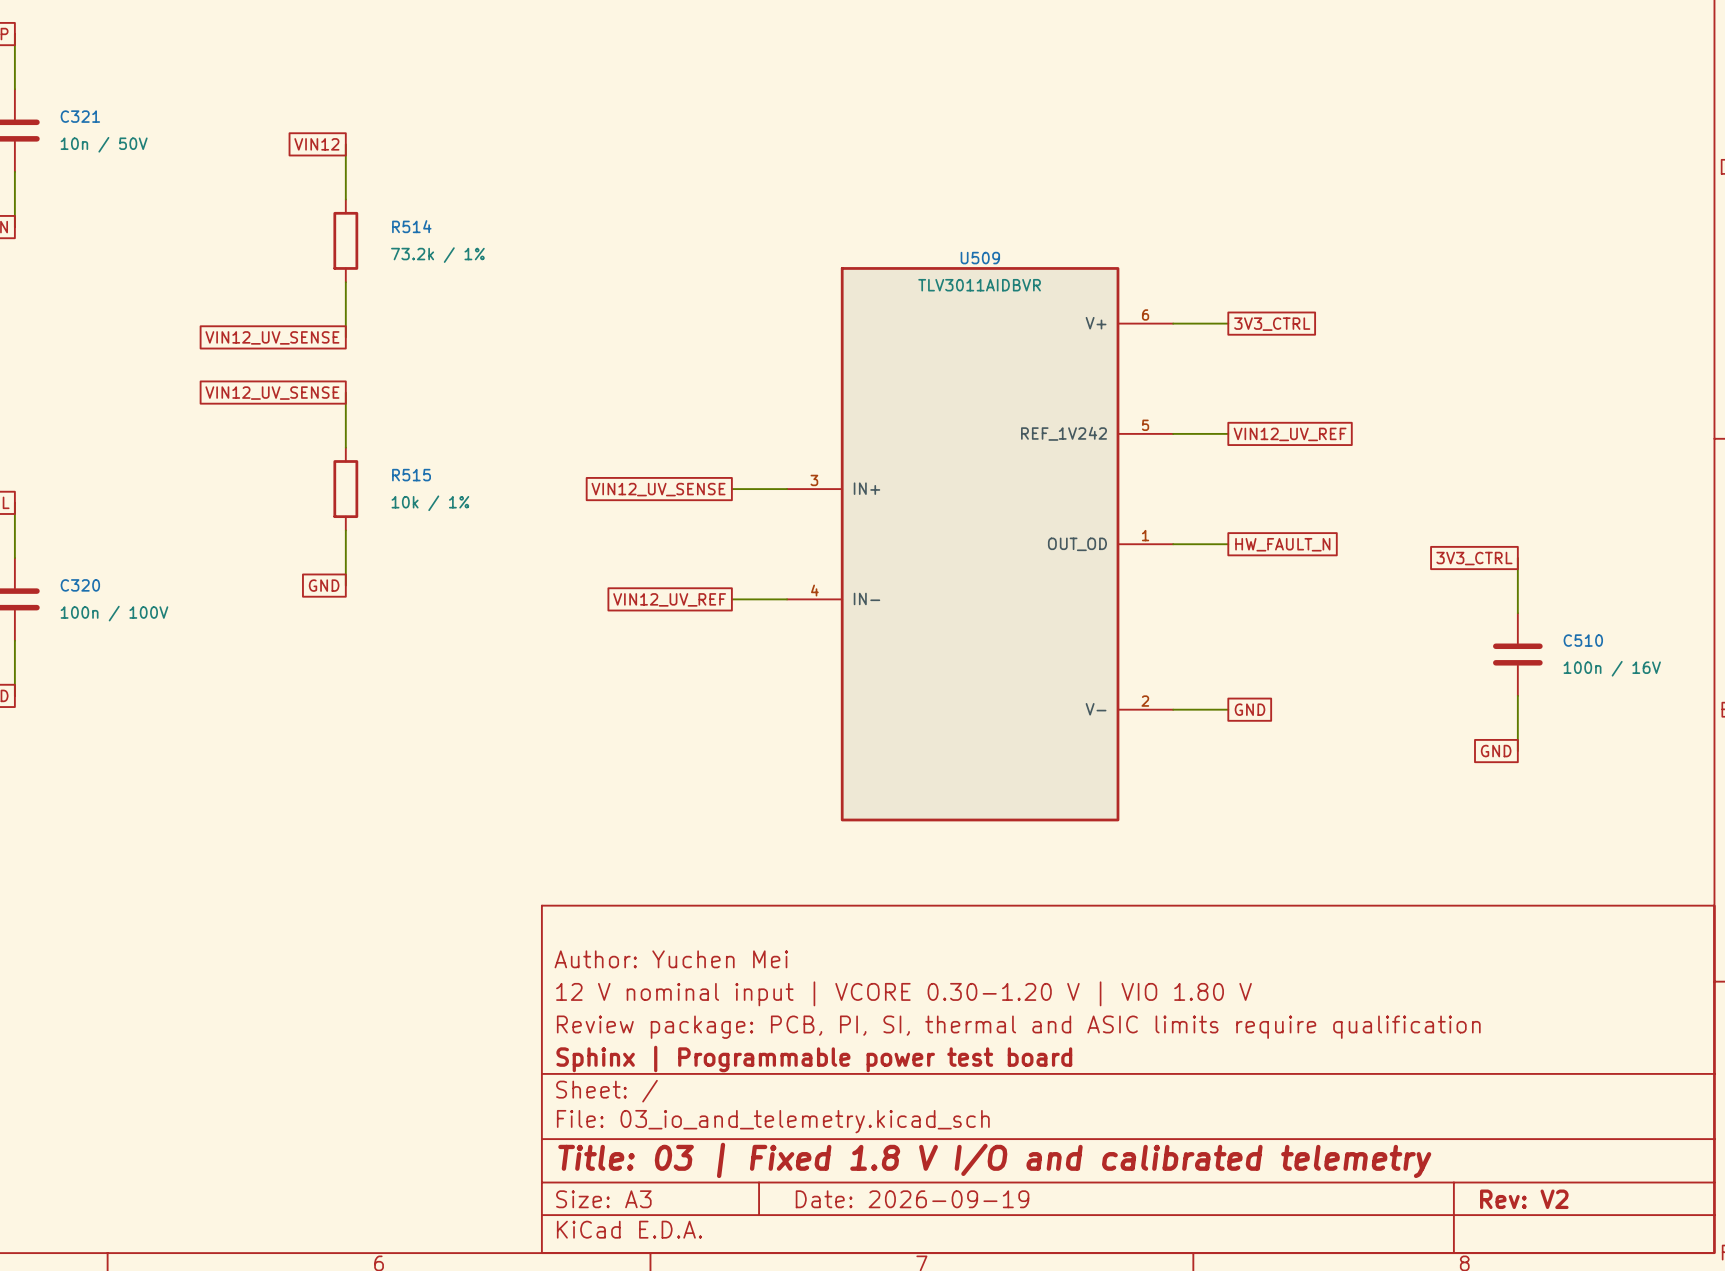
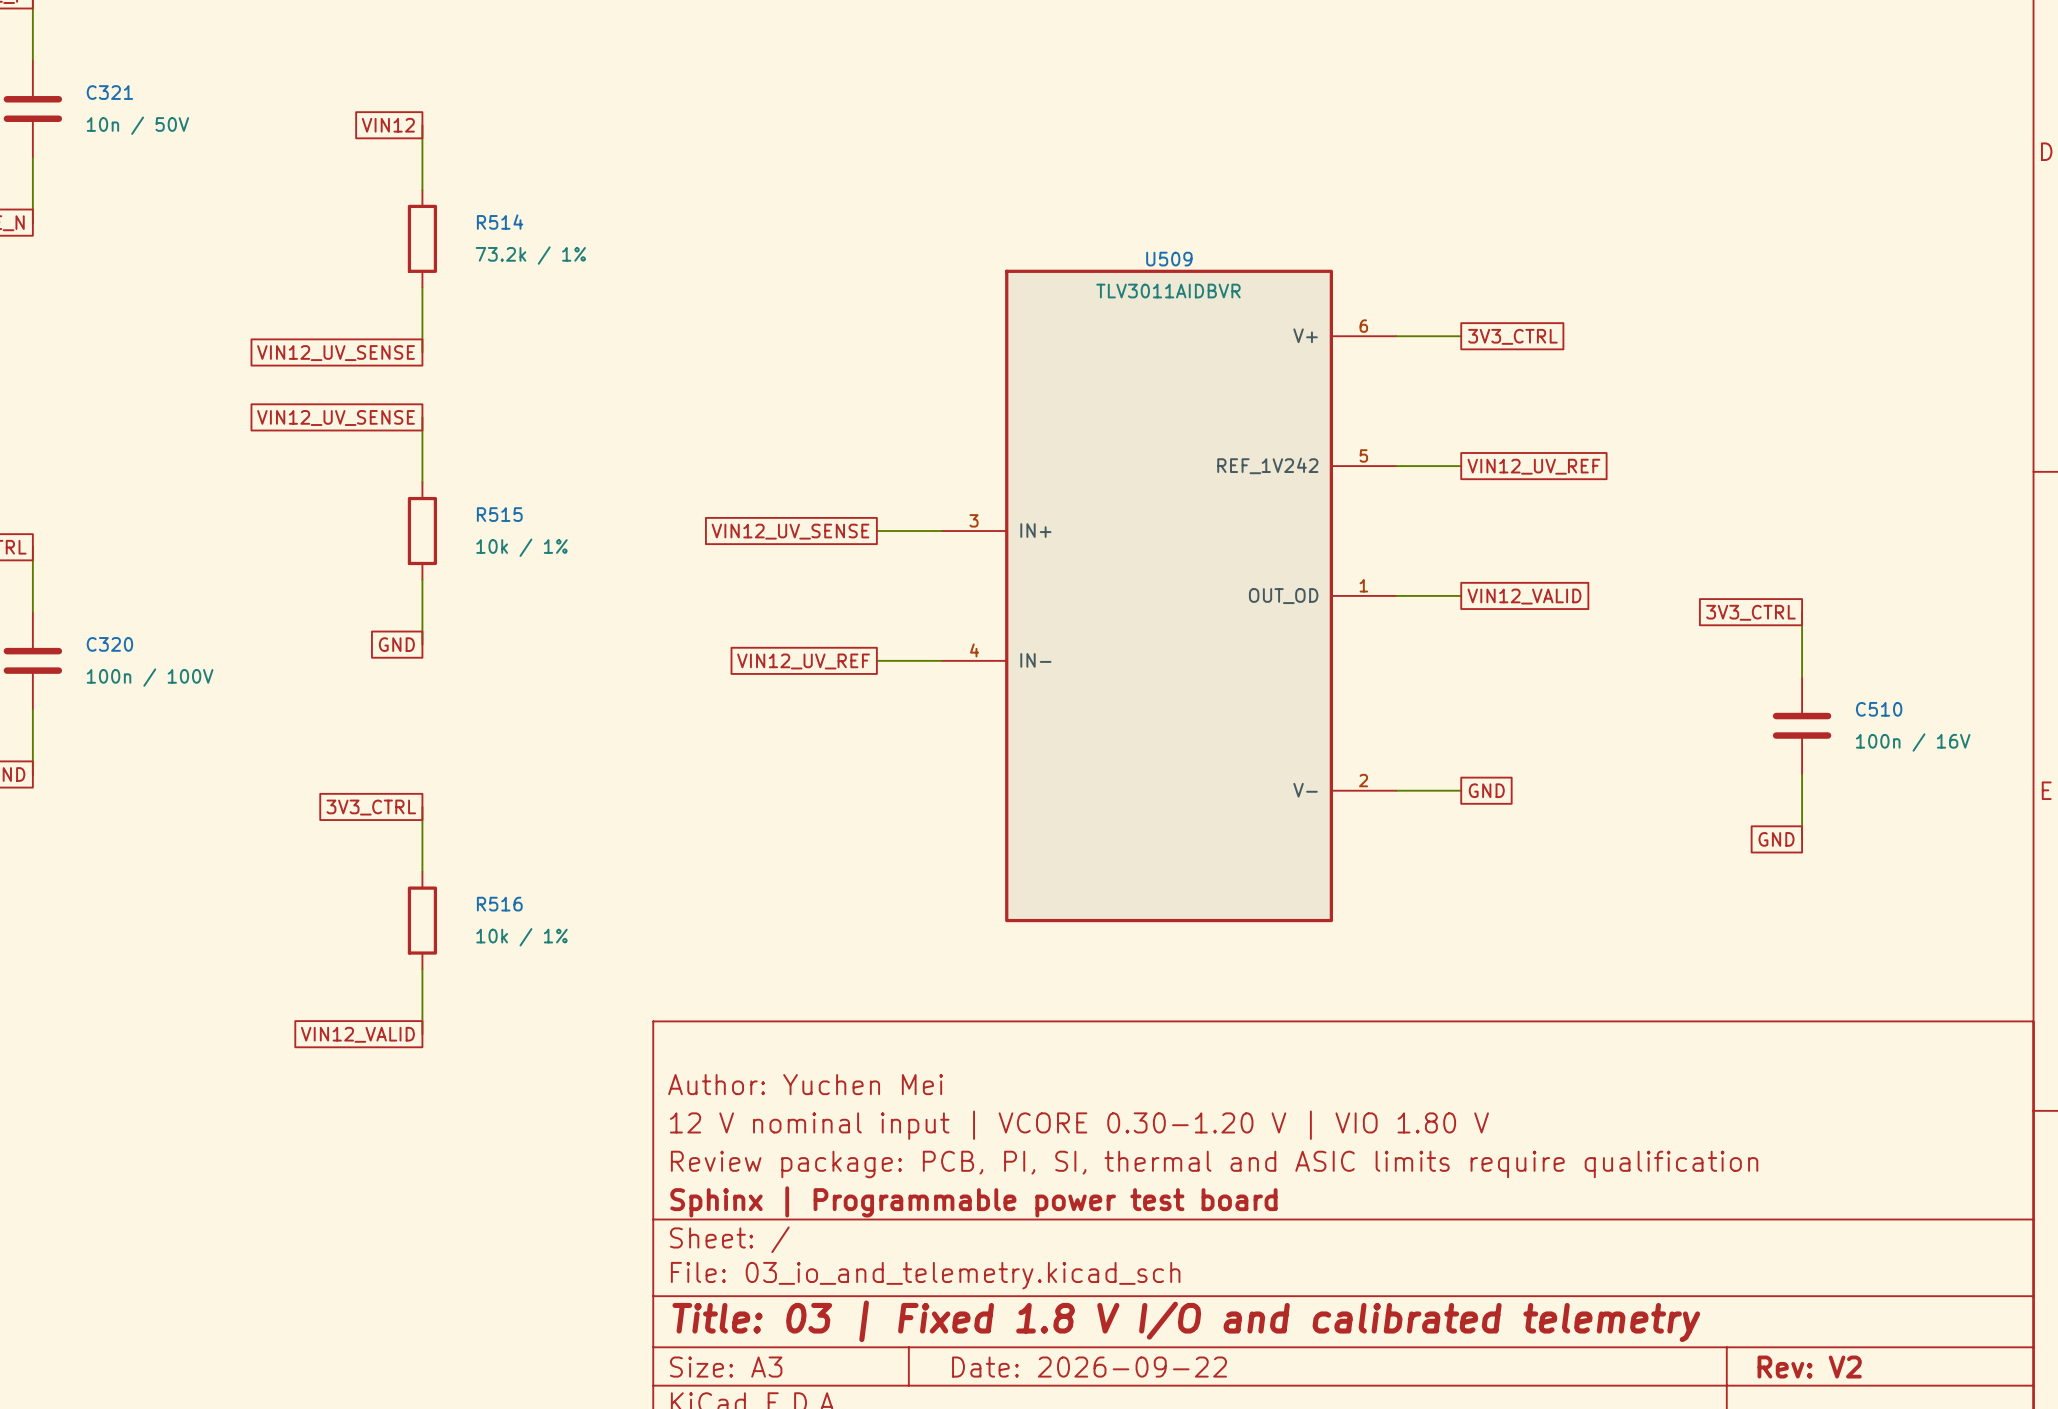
global label: HW_FAULT_N (1282, 544) -> VIN12_VALID (1524, 596)
global label: none -> 3V3_CTRL (371, 807)
wire: none -> (422, 806) (422, 871)
R516: none -> 10k / 1% (422, 920)
wire: none -> (422, 969) (422, 1034)
global label: none -> VIN12_VALID (357, 1034)
title block: Date: 2026-09-19 (912, 1199) -> Date: 2026-09-22 (1089, 1367)

